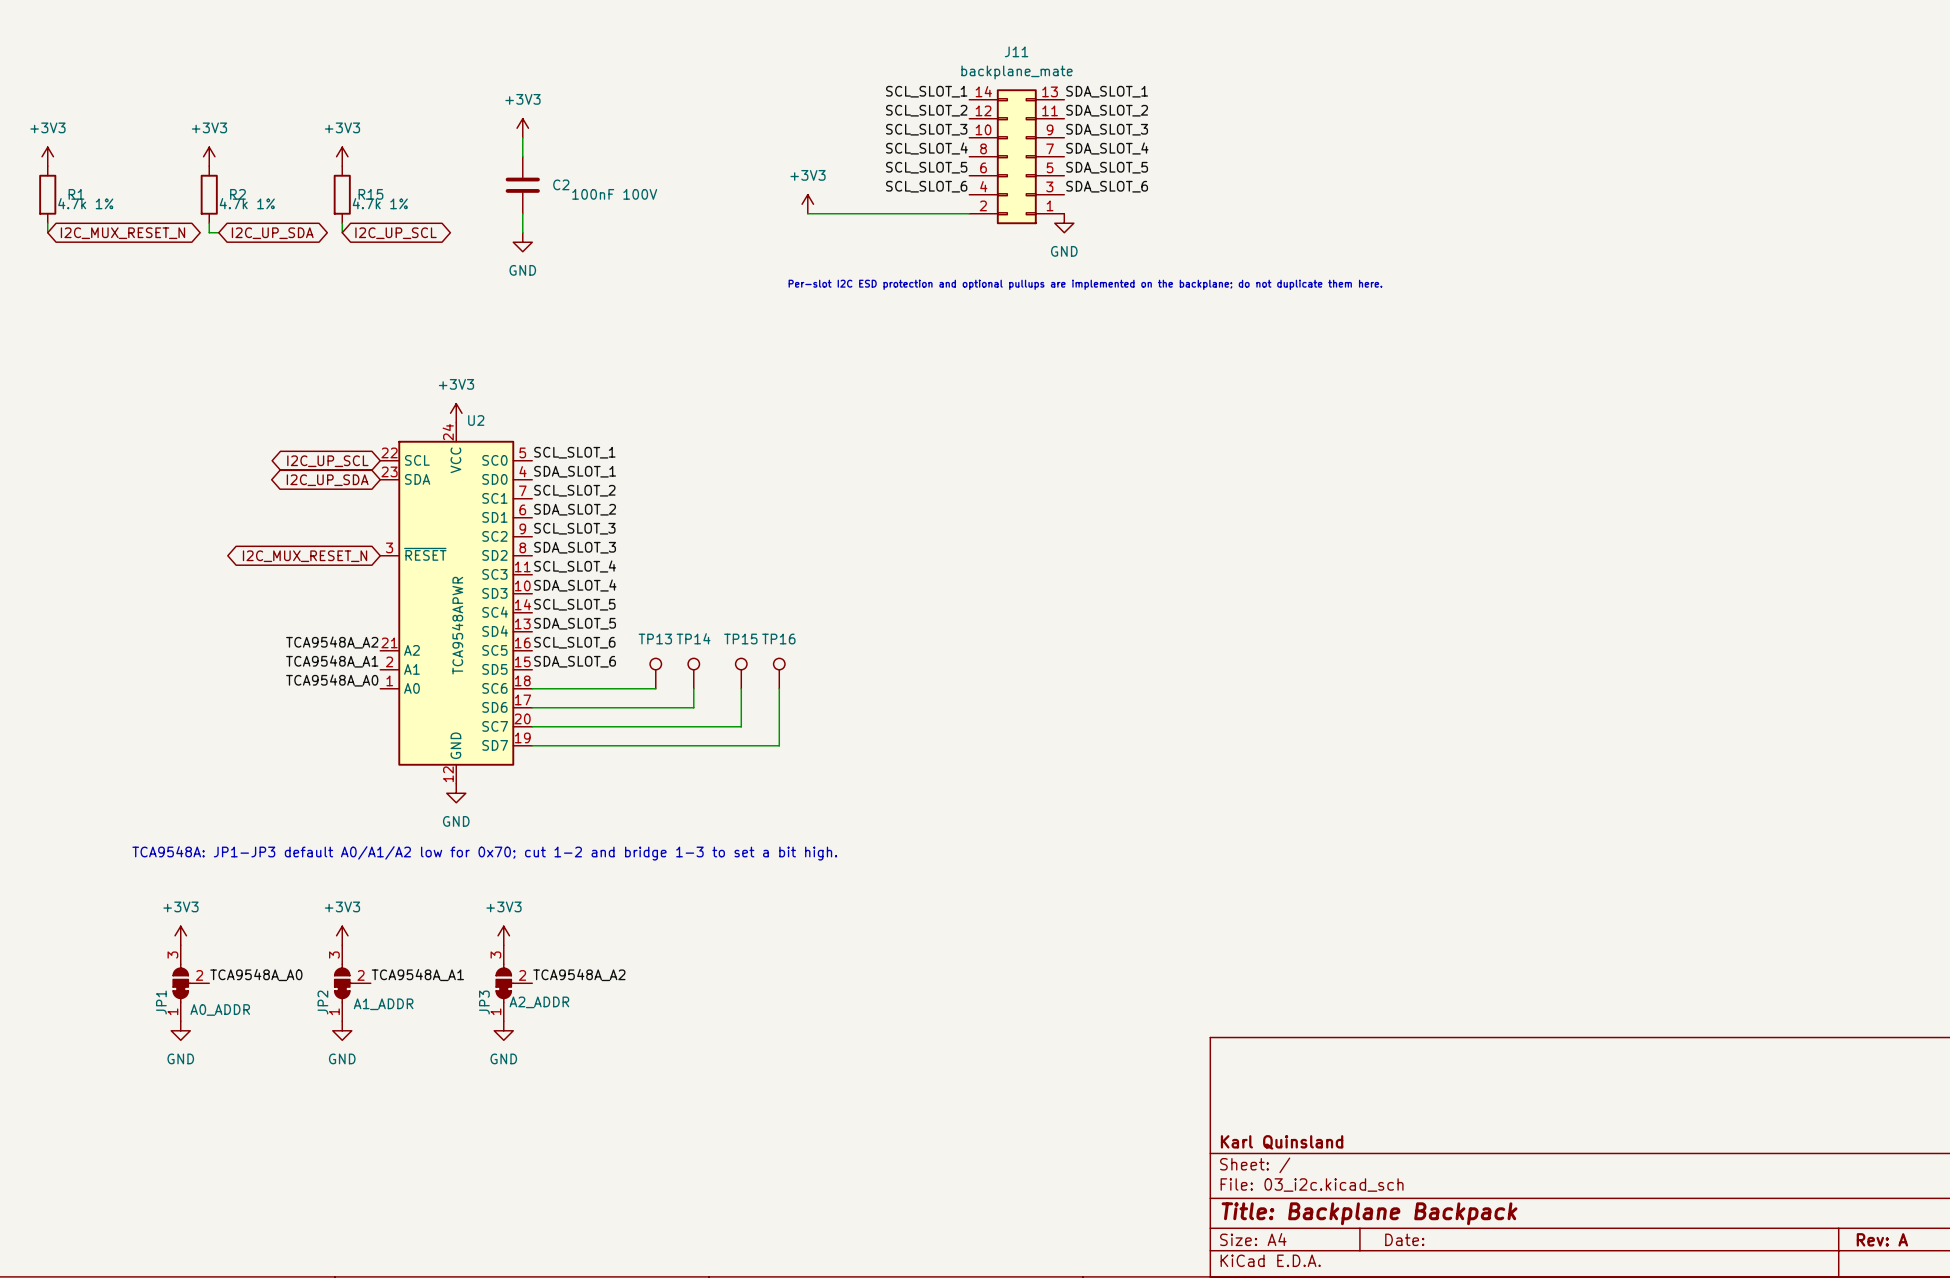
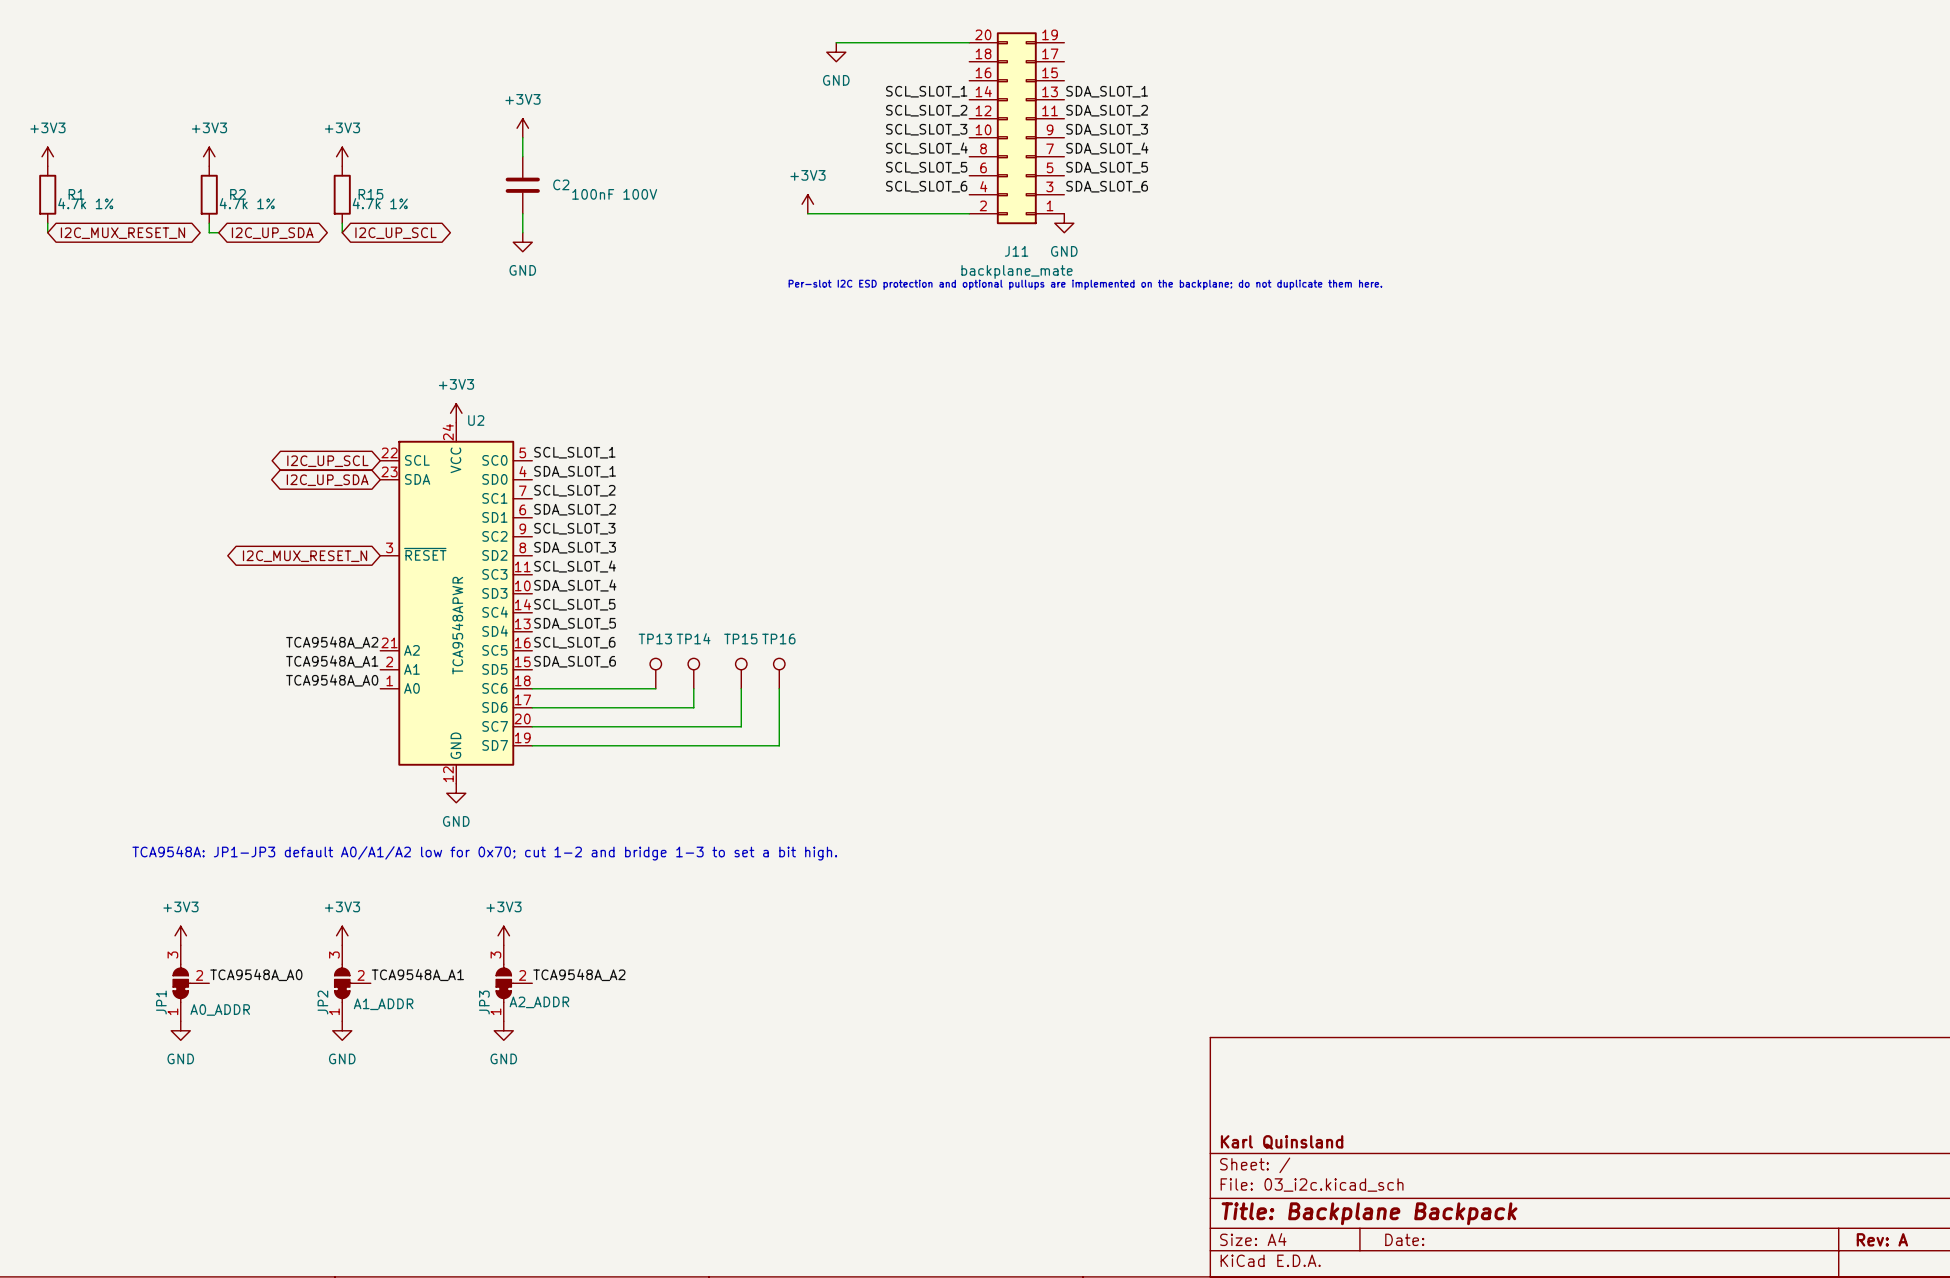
wire: none -> (836, 42) (969, 42)
J11 name position: J11 (1016, 51) -> J11 (1016, 251)
power symbol: none -> GND (836, 52)
J11 value position: backplane_mate (1017, 72) -> backplane_mate (1017, 271)
J11 symbol: [969, 89, 1065, 225] -> [969, 32, 1065, 225]

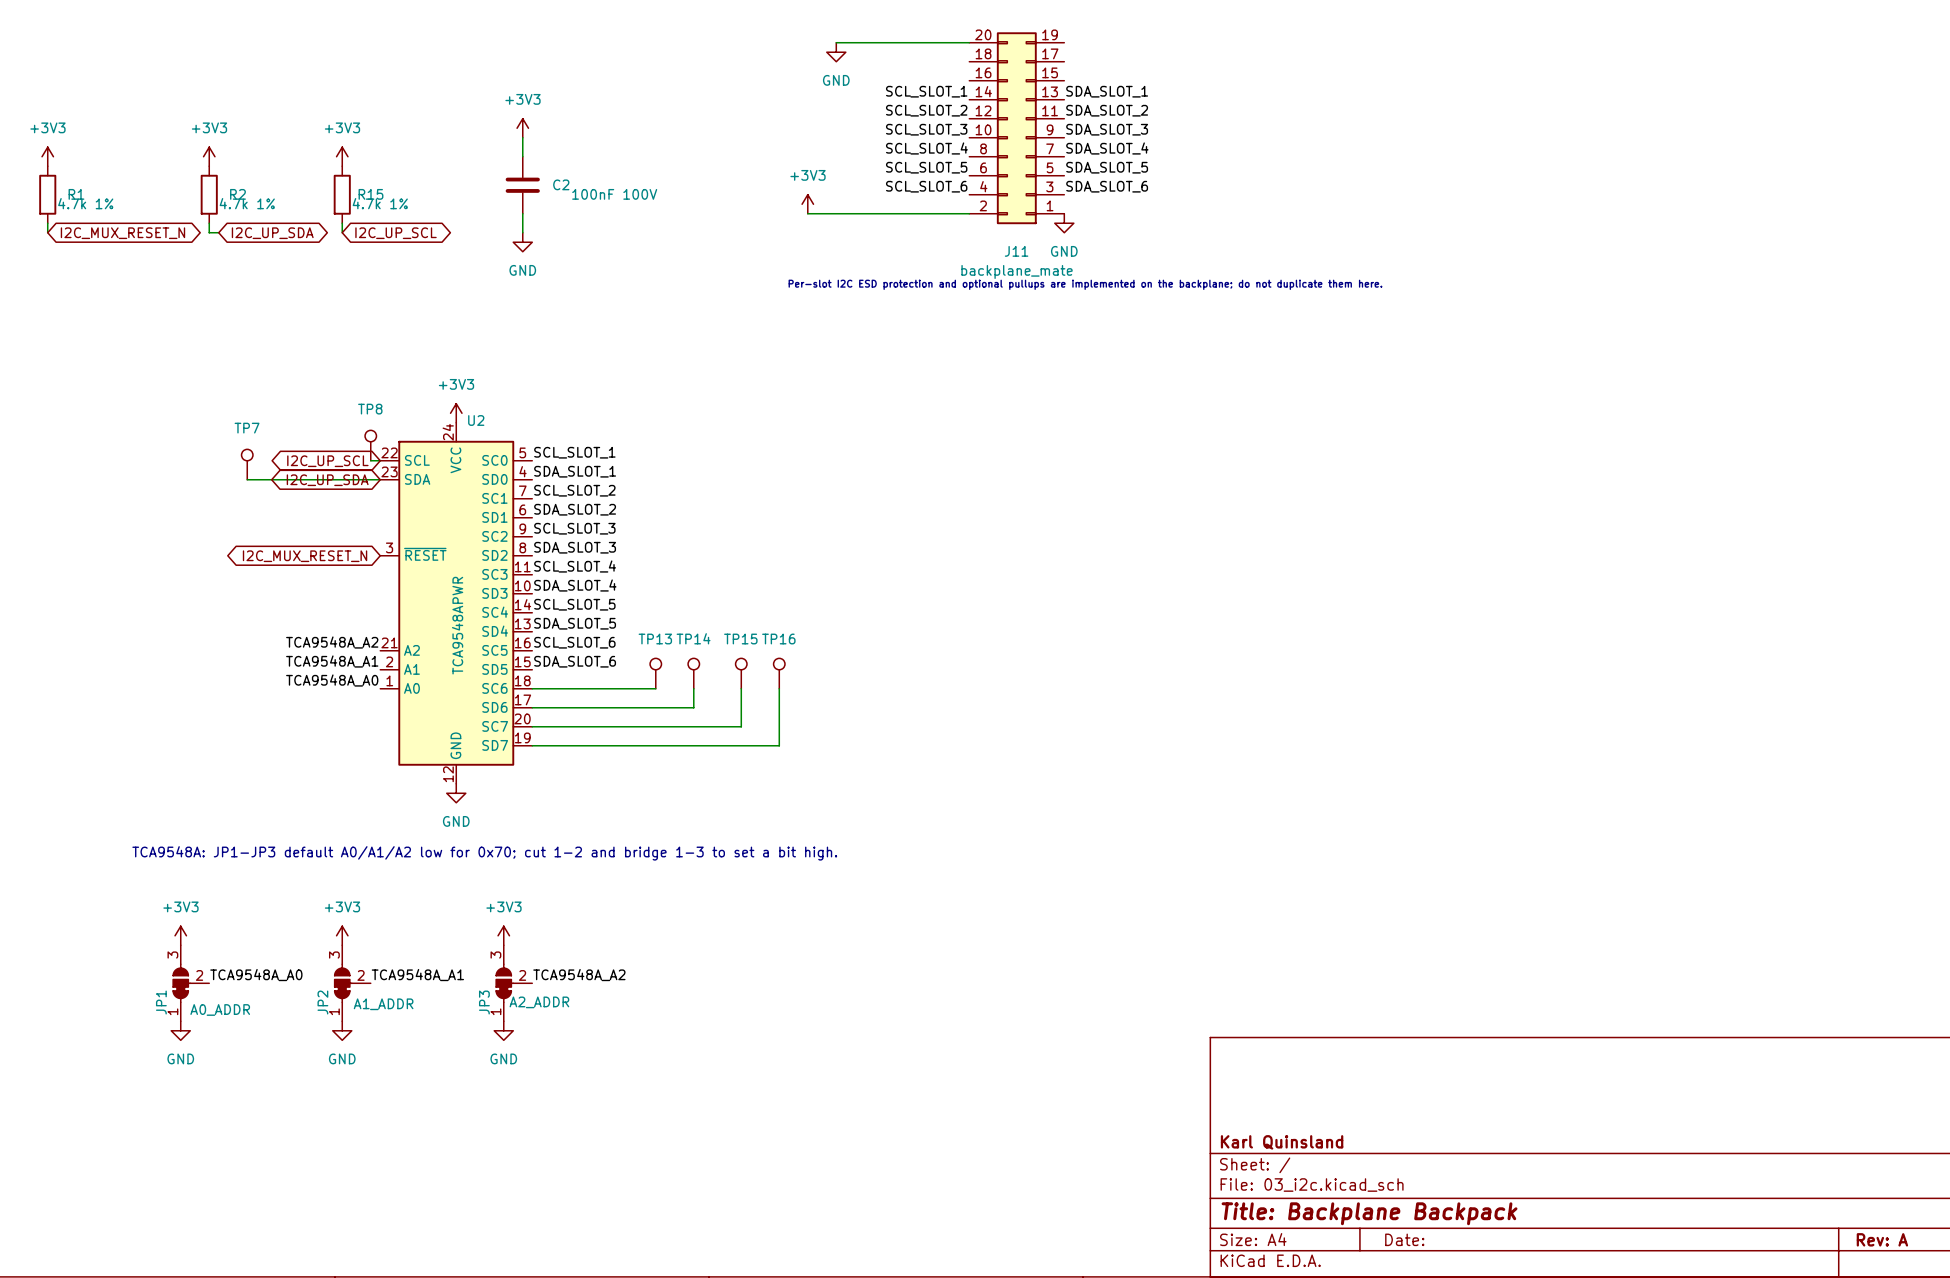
TP8: none -> (370, 445)
wire: none -> (370, 460) (380, 460)
TP7: none -> (247, 464)
wire: none -> (247, 479) (380, 479)

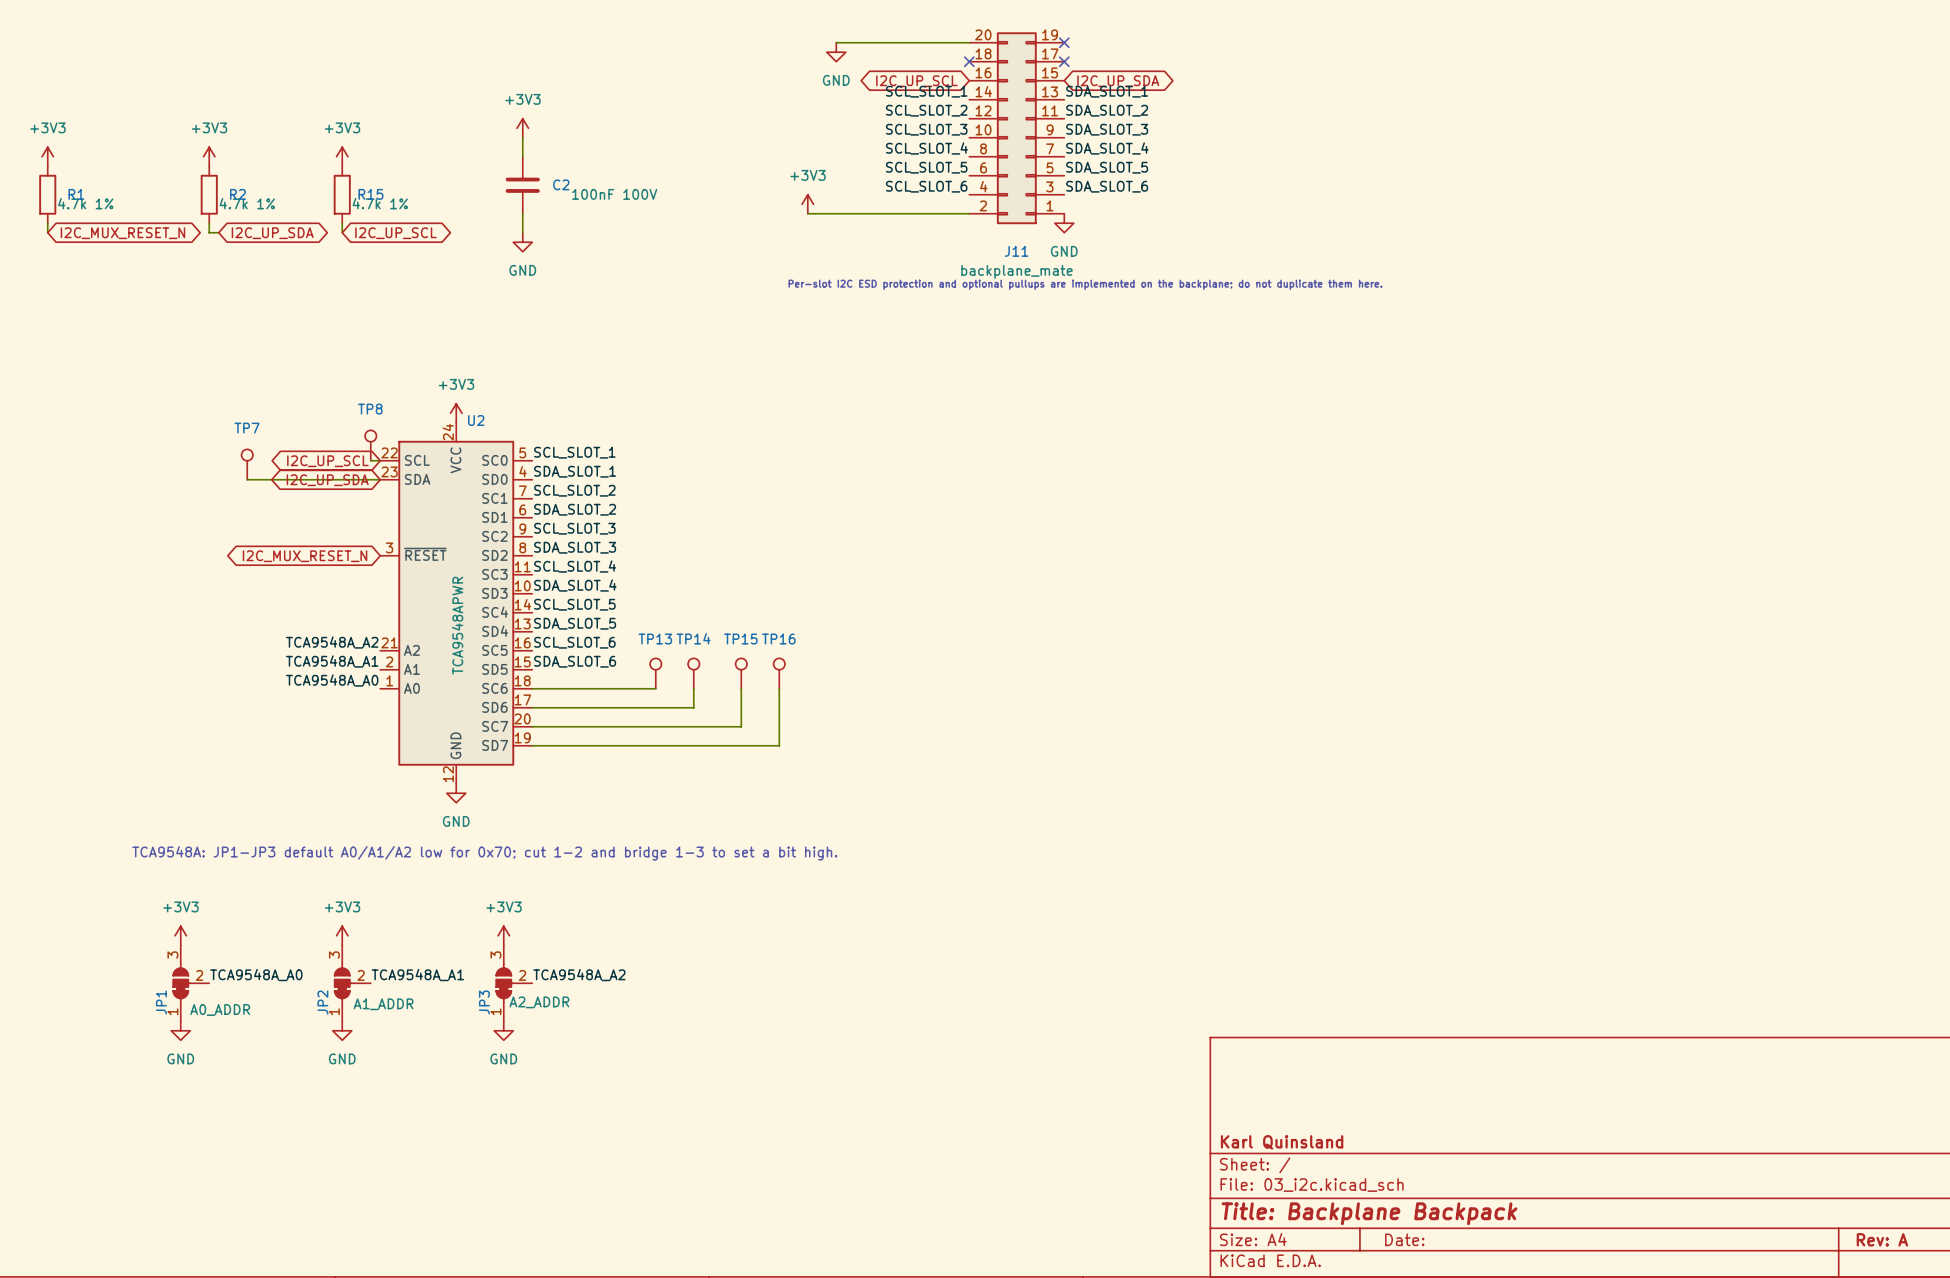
no-connect mark: none -> (1064, 42)
no-connect mark: none -> (969, 61)
no-connect mark: none -> (1064, 61)
global label: none -> I2C_UP_SCL (916, 81)
global label: none -> I2C_UP_SDA (1118, 81)

